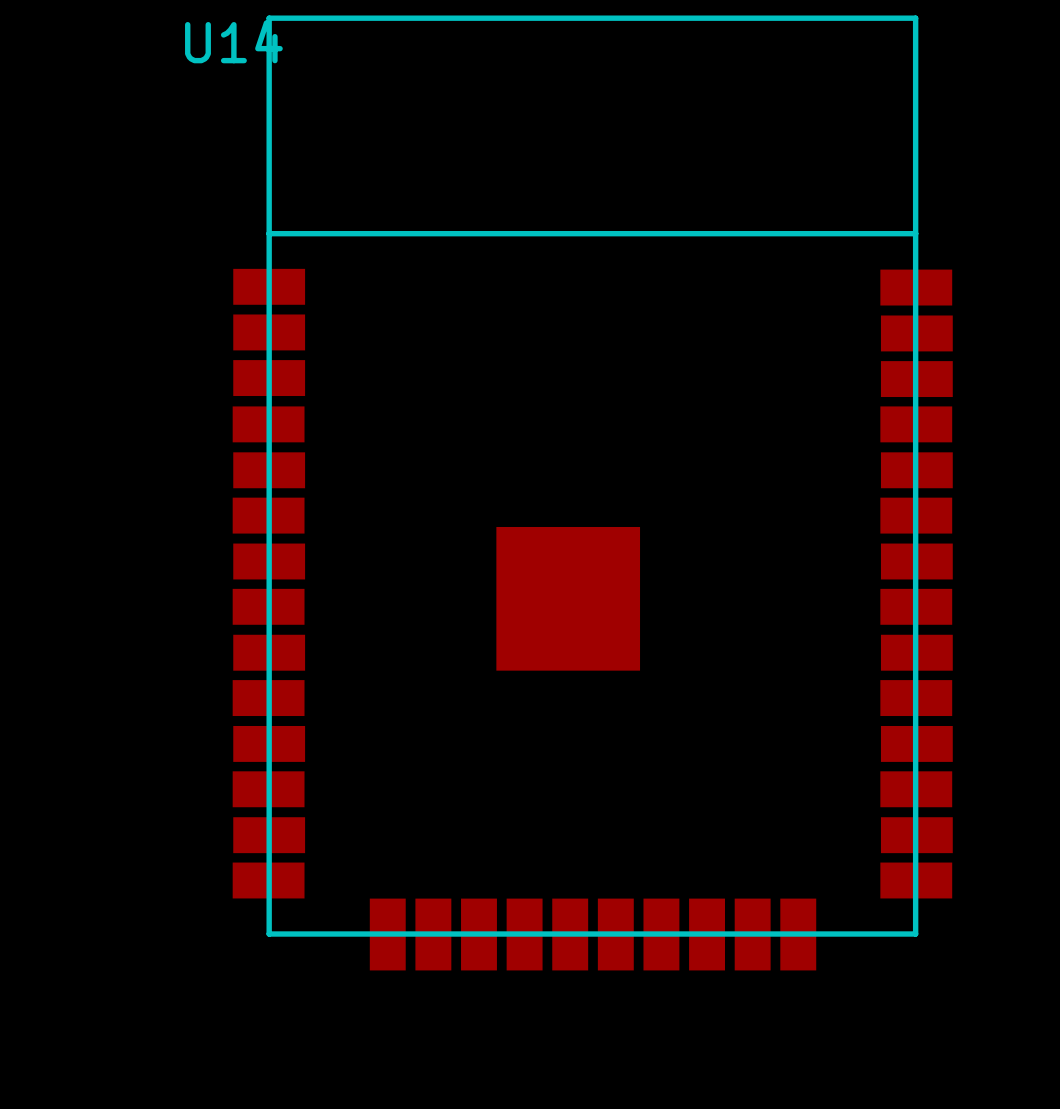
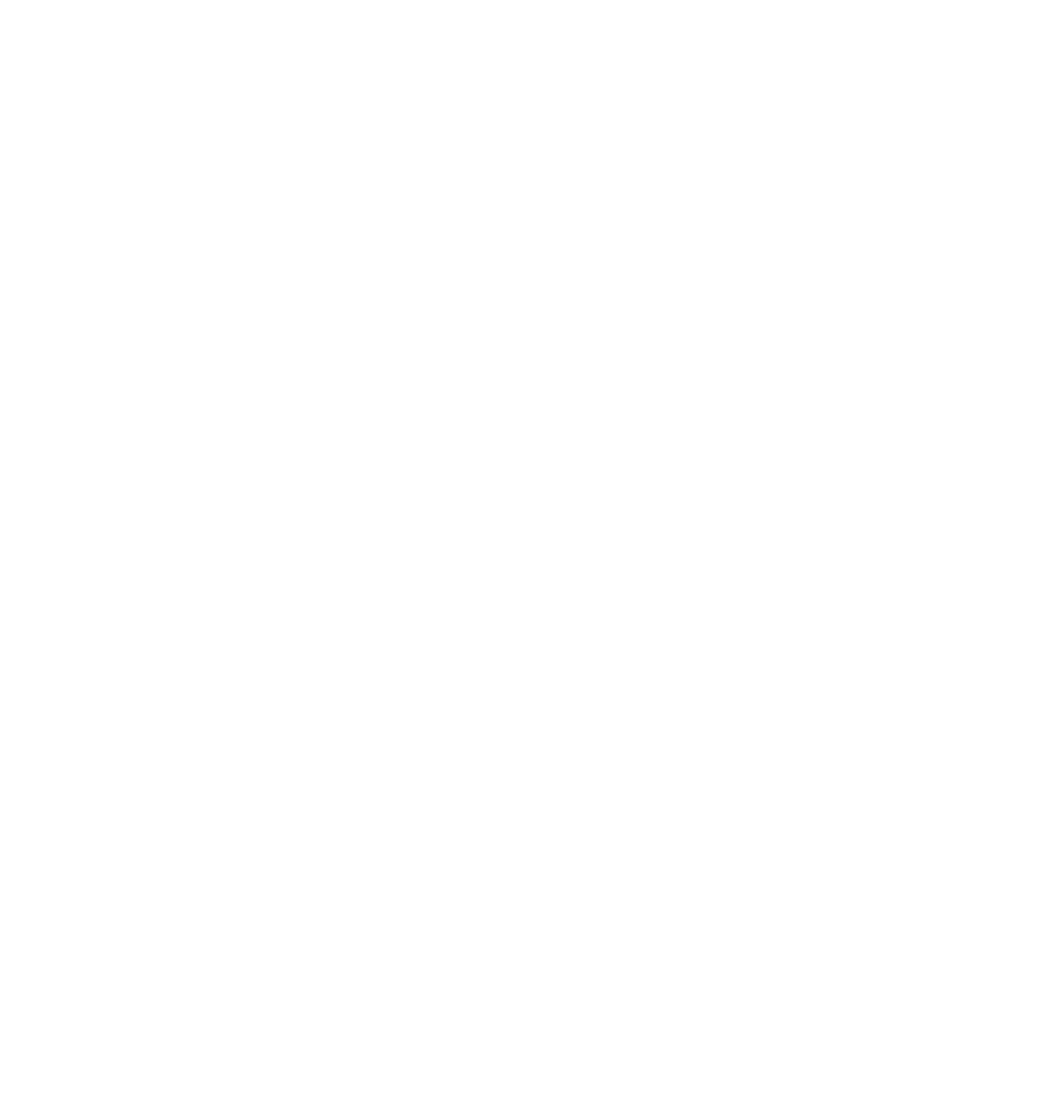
U14: (592, 492) -> none

